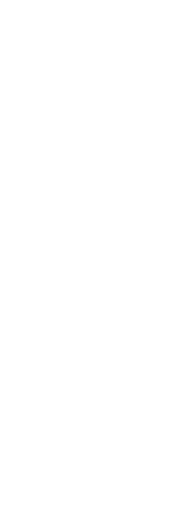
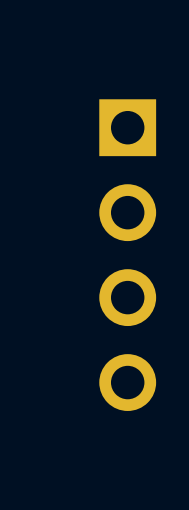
part: none -> (127, 255)

